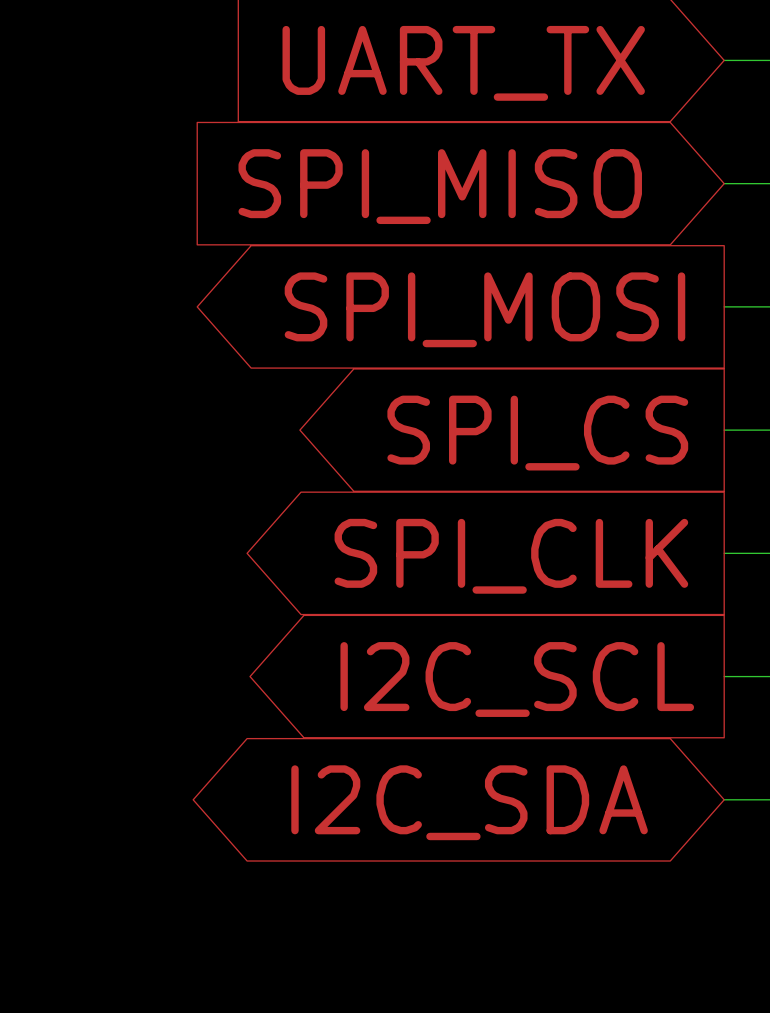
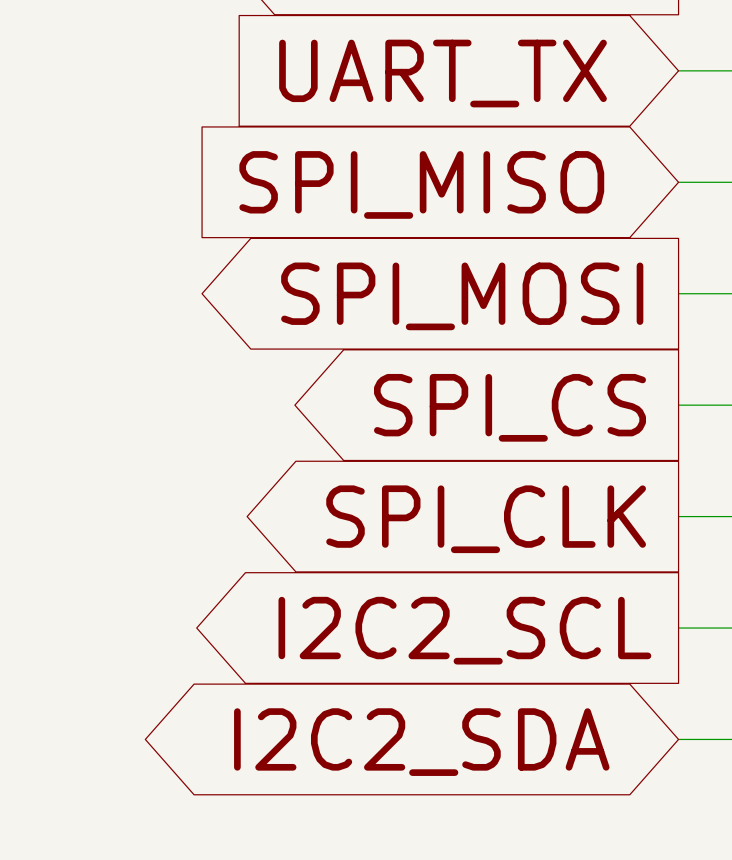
global label: I2C_SCL (517, 679) -> I2C2_SCL (464, 630)
global label: I2C_SDA (469, 802) -> I2C2_SDA (421, 742)

